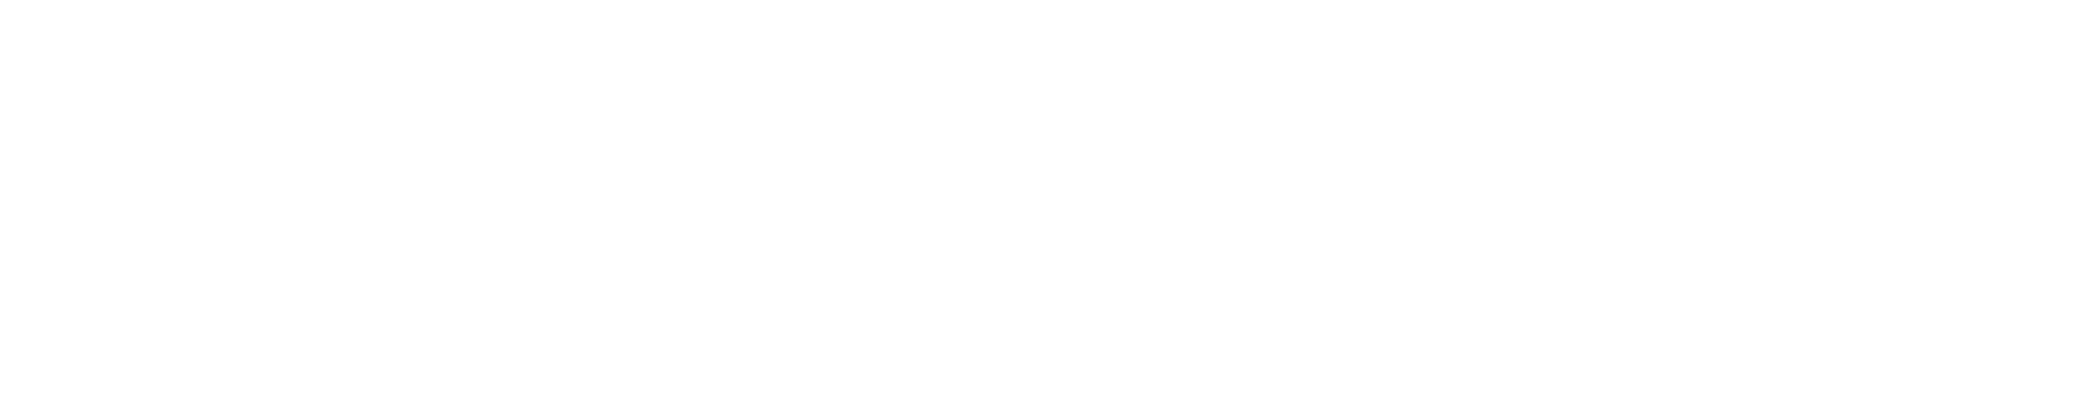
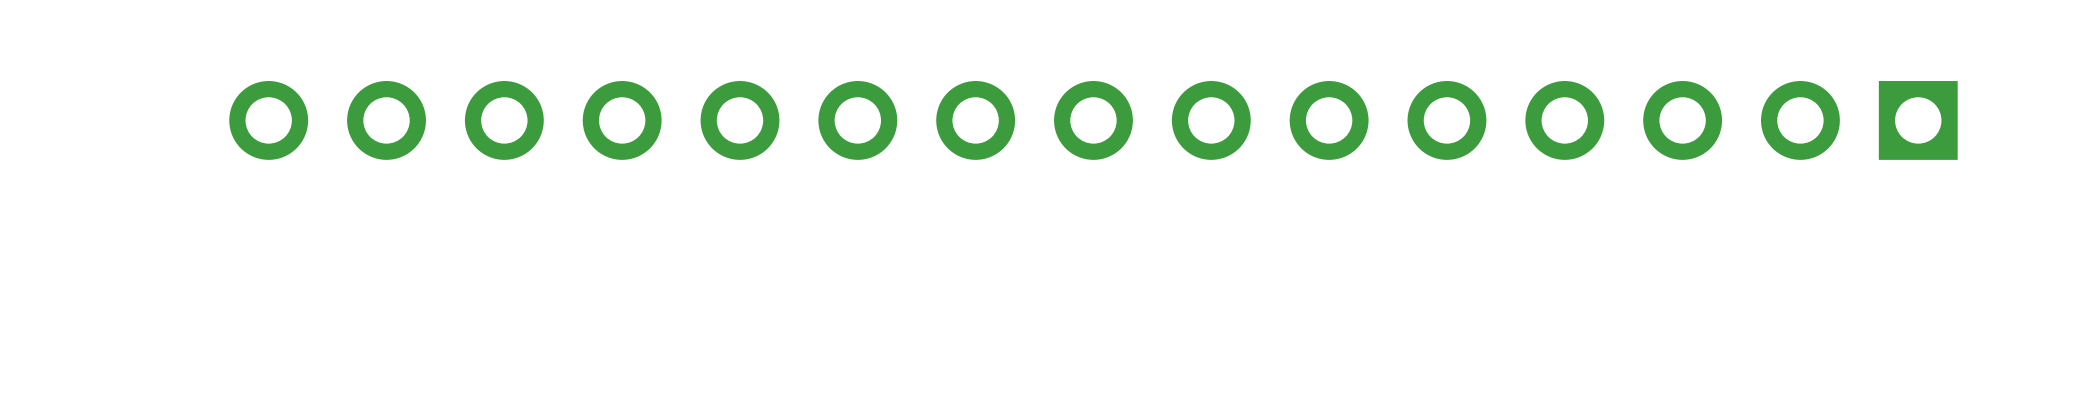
part: none -> (1093, 120)

